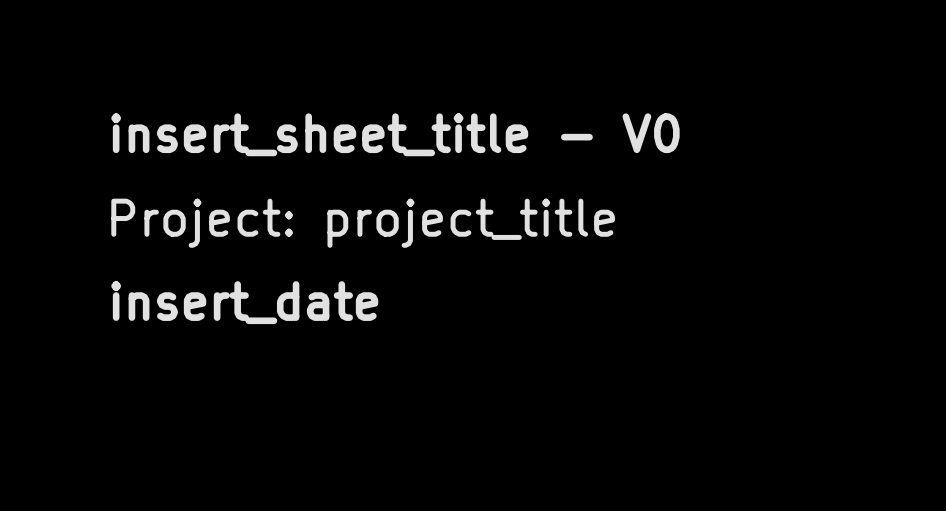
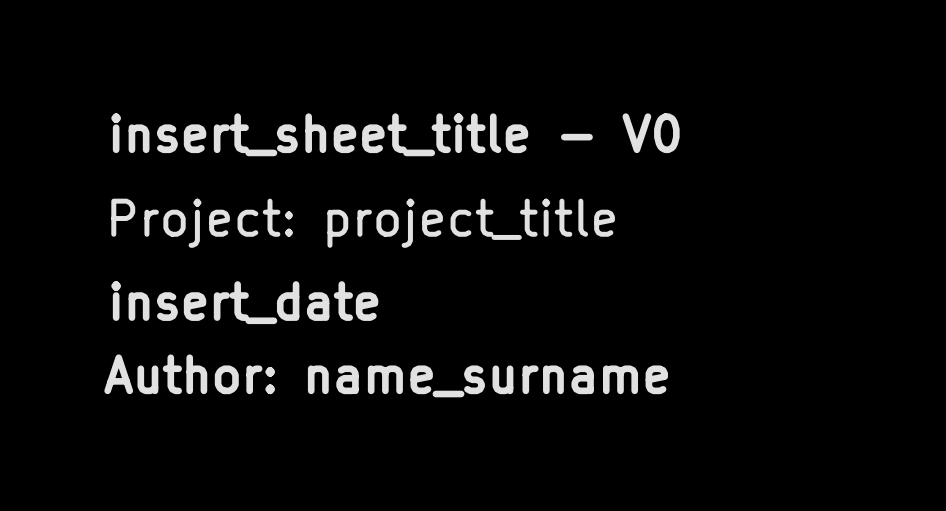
text: none -> Author: name_surname (386, 375)

